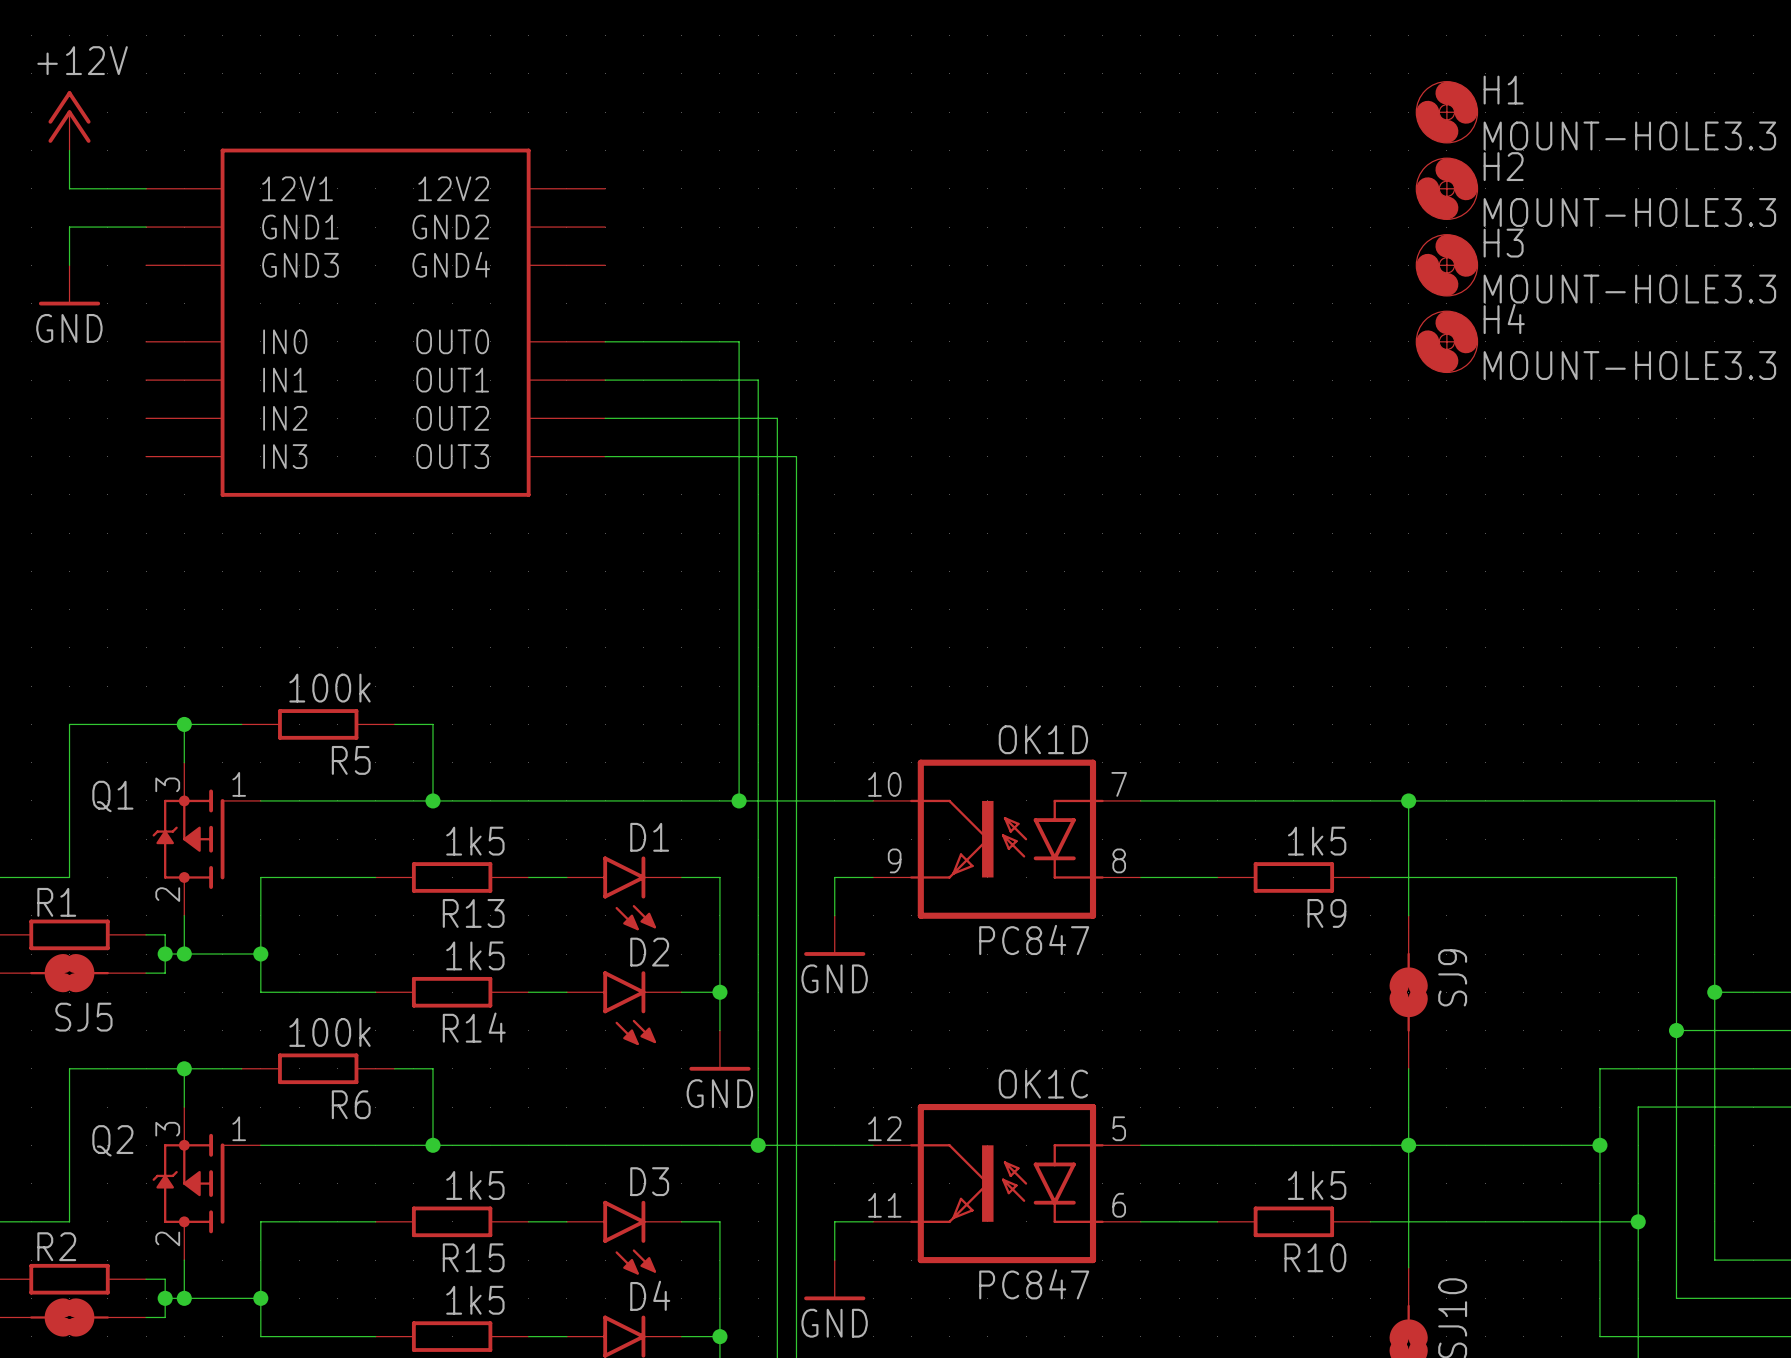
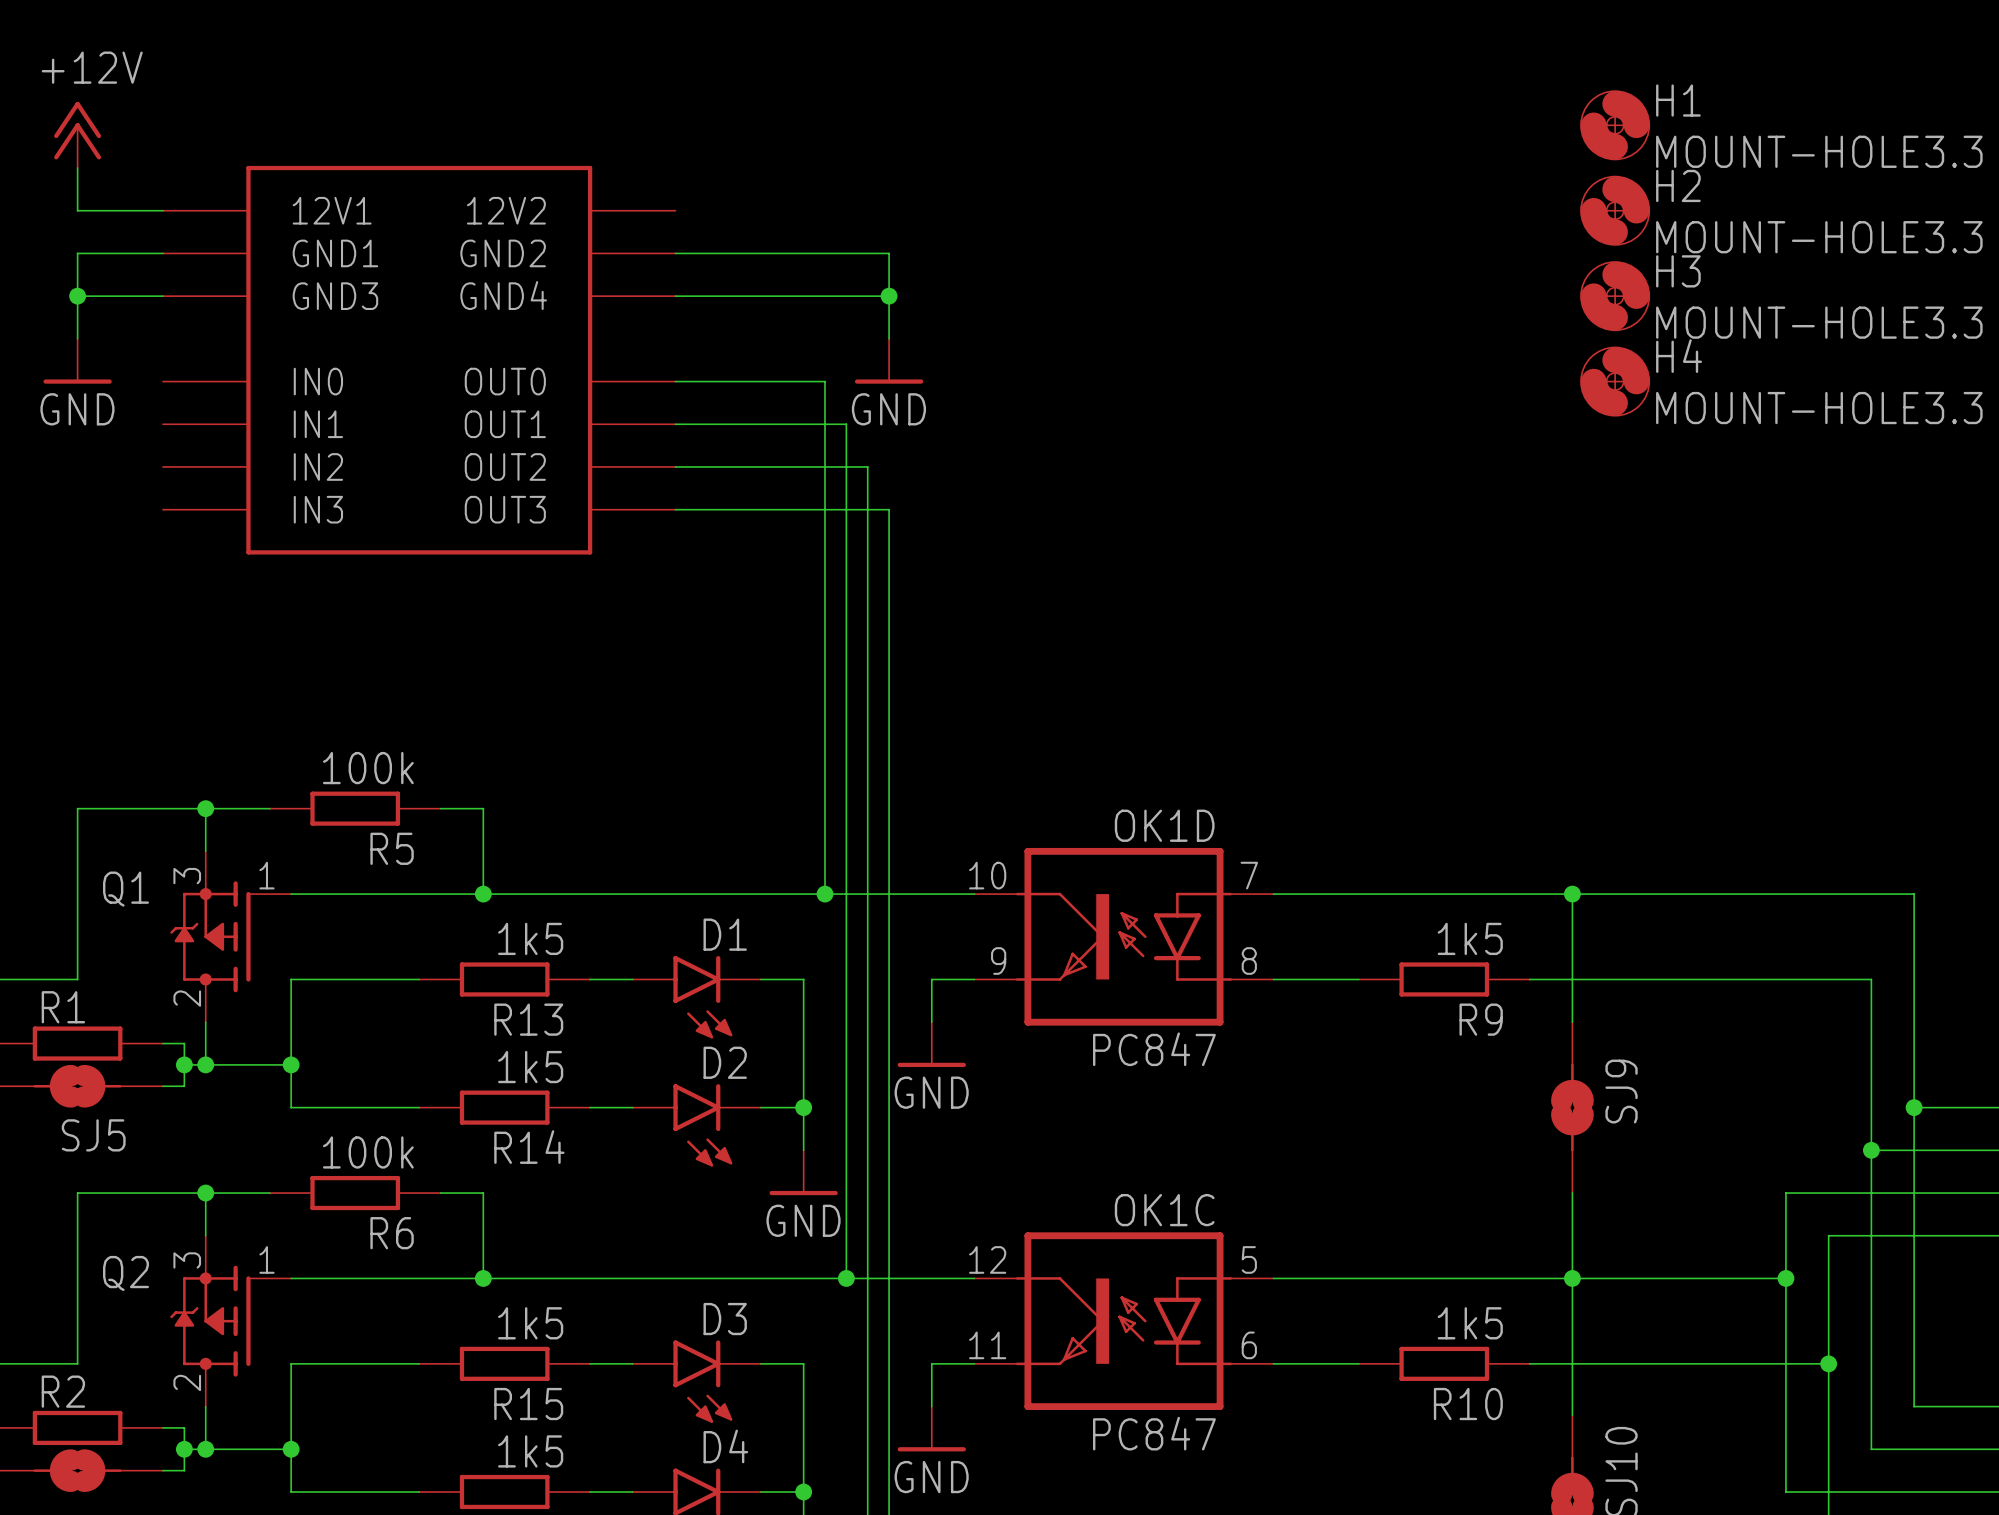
wire: none -> (675, 253) (889, 253) (889, 338)
junction: none -> (77, 296)
wire: none -> (163, 296) (77, 296) (77, 338)
wire: none -> (675, 296) (889, 296)
junction: none -> (889, 296)
power symbol position: GND (69, 285) -> GND (77, 361)
power symbol: none -> GND (889, 361)

